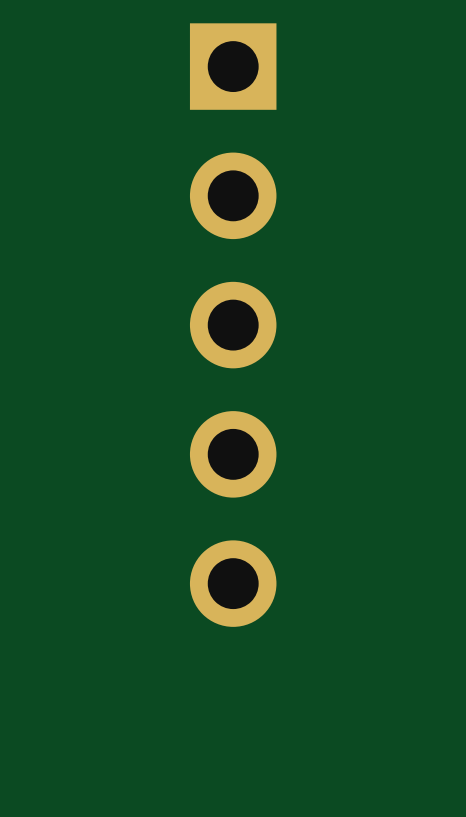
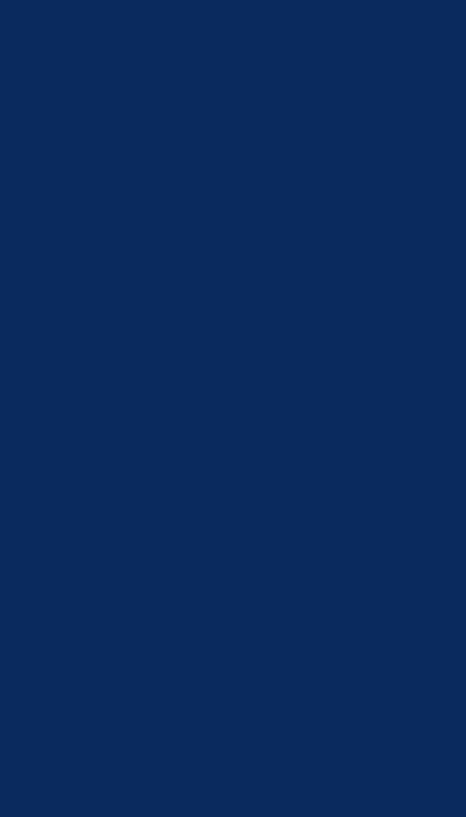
part: (233, 325) -> none

